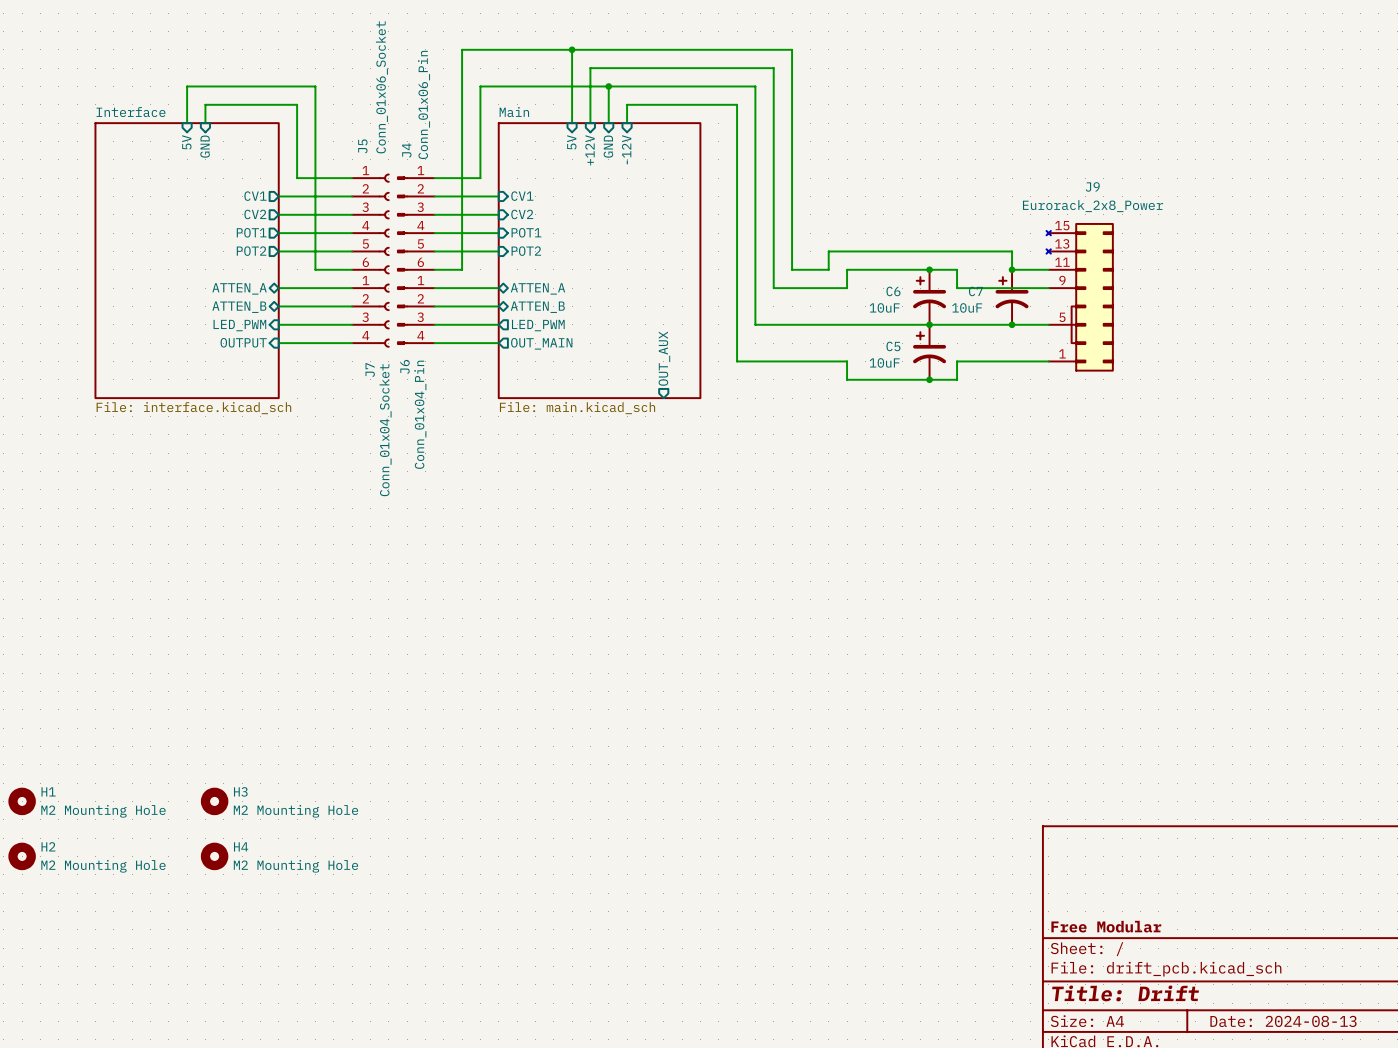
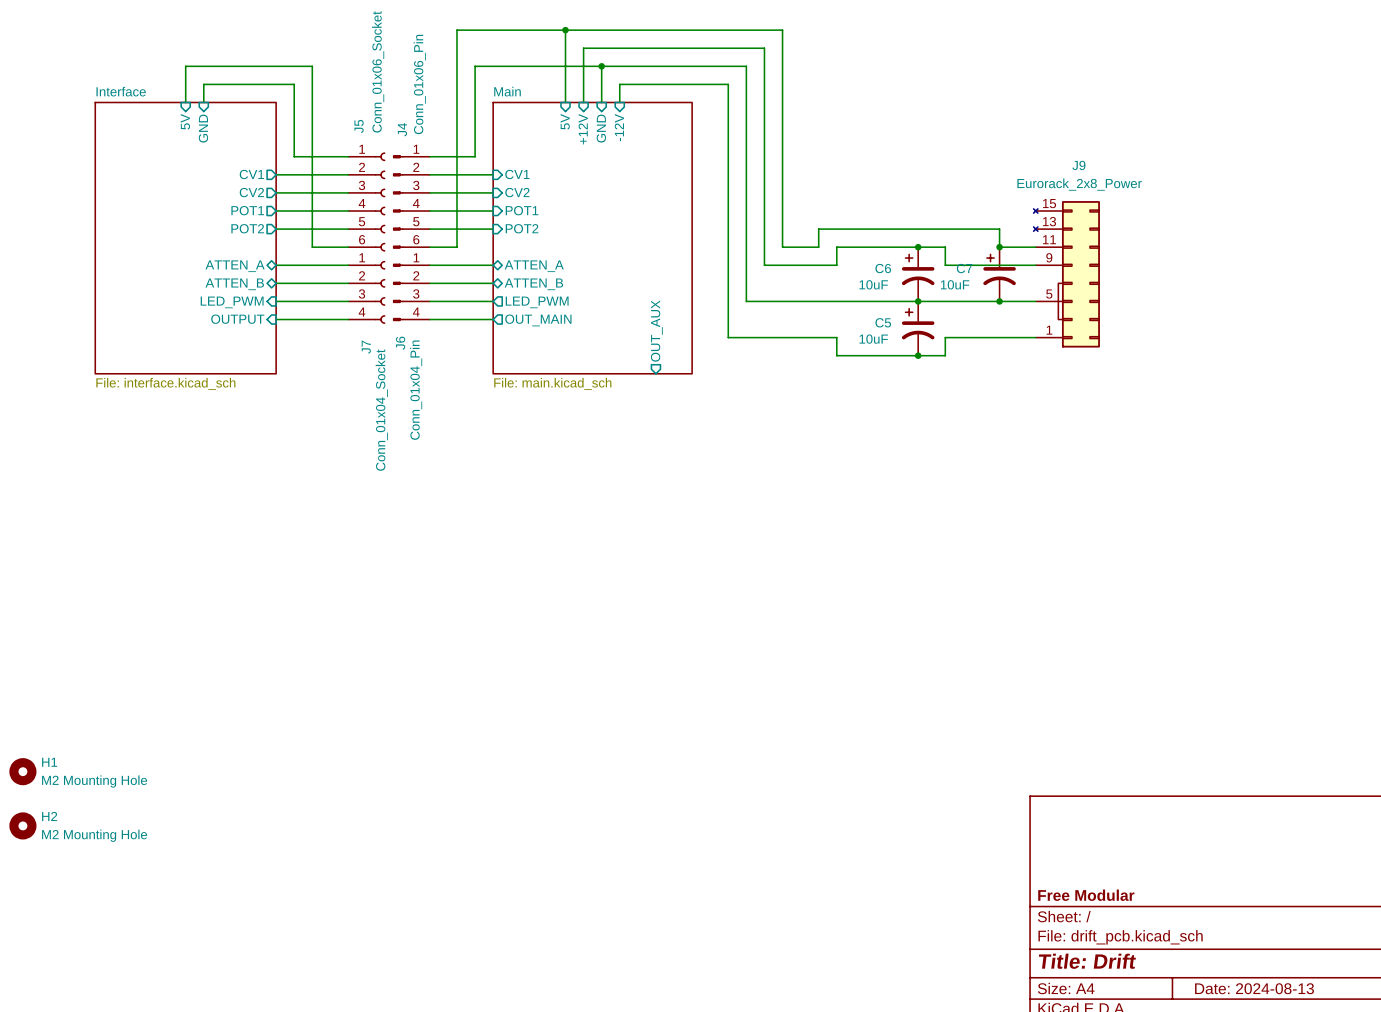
H3: M2 Mounting Hole (214, 801) -> none
H4: M2 Mounting Hole (214, 856) -> none

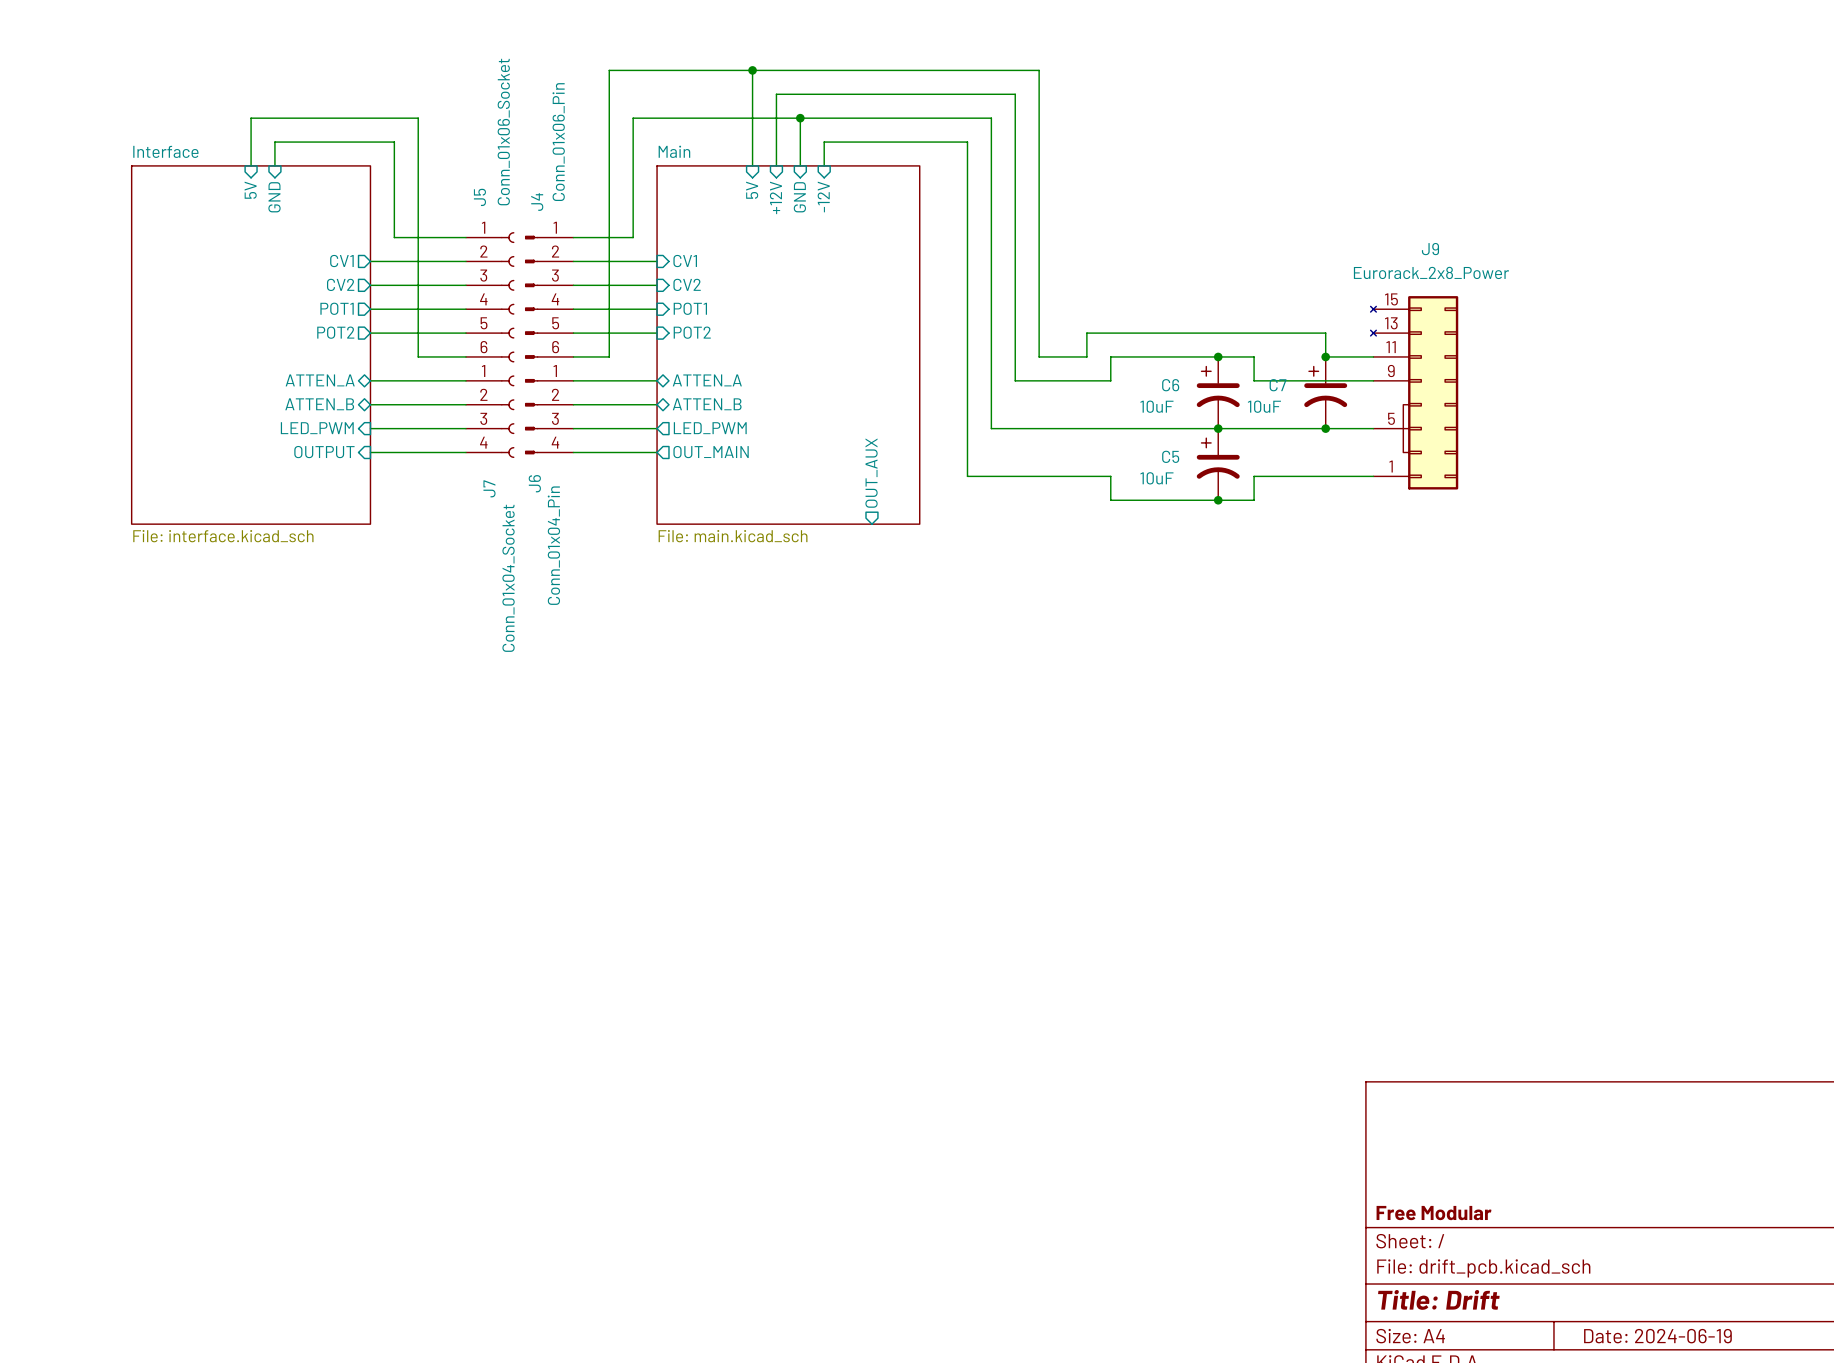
H1: M2 Mounting Hole (22, 771) -> none
H2: M2 Mounting Hole (22, 825) -> none
title block: Date: 2024-08-13 (1254, 988) -> Date: 2024-06-19 (1657, 1336)

